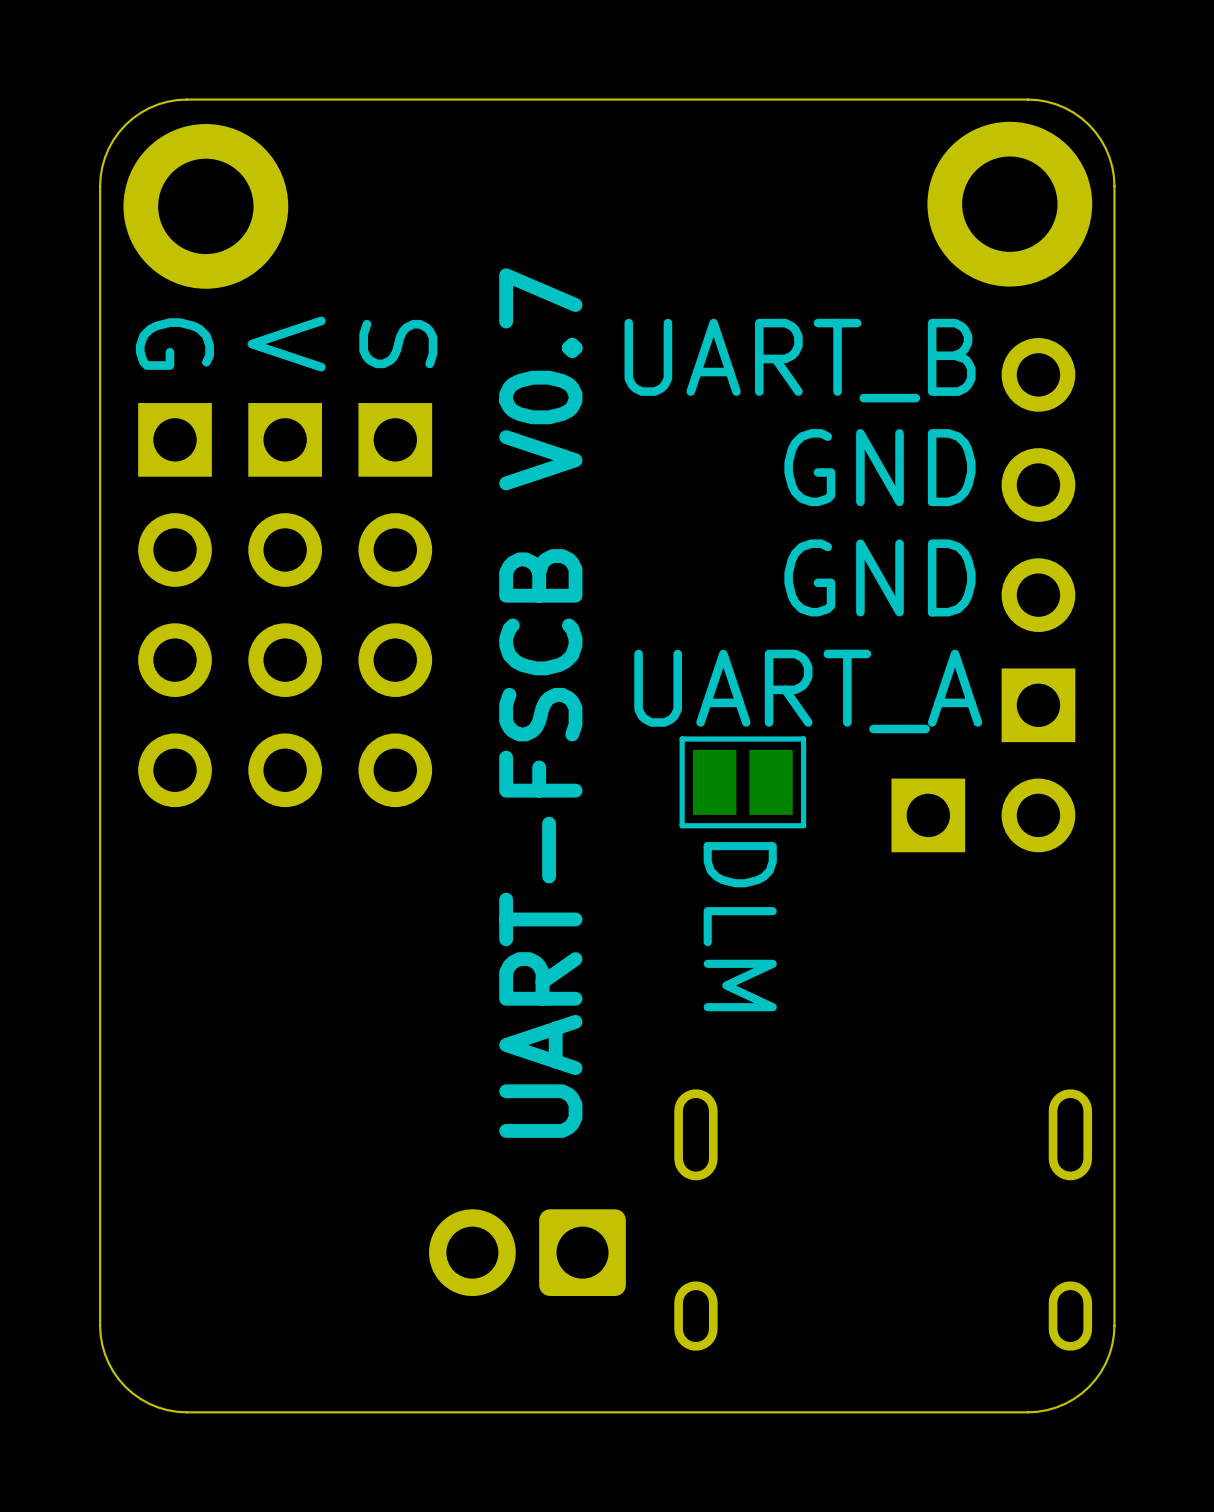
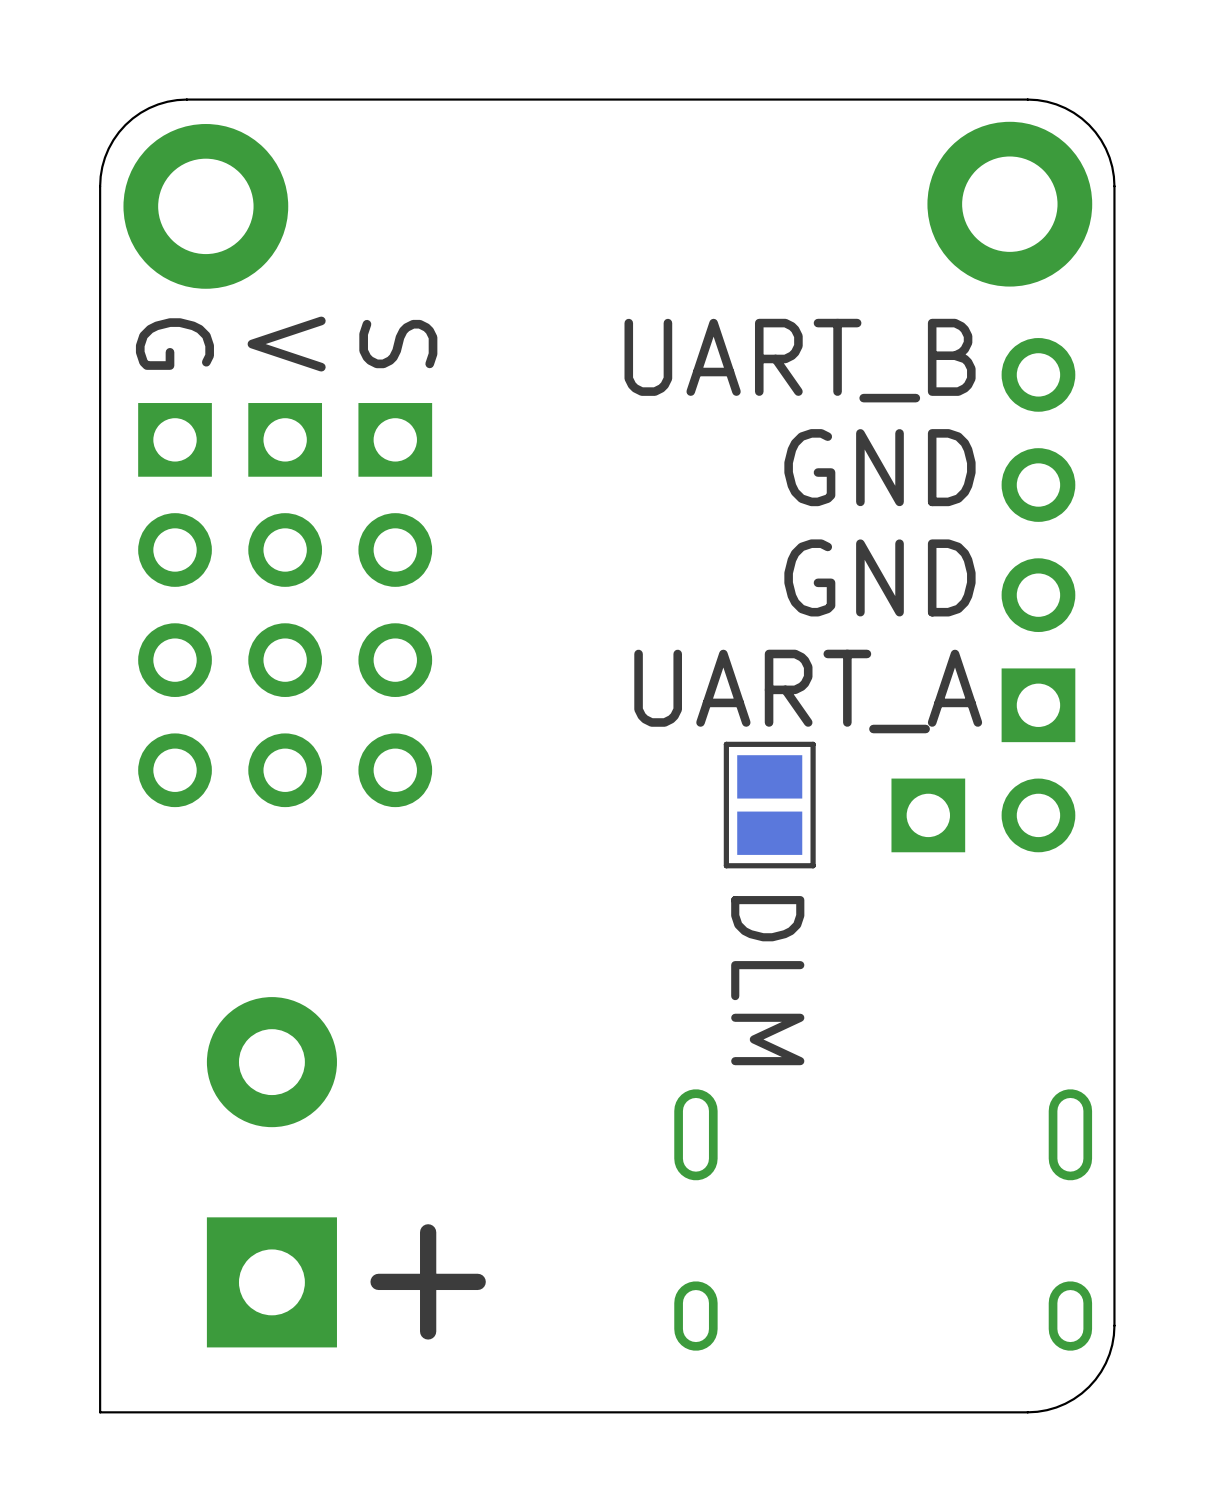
text: UART-FSCB V0.7 (540, 703) -> none
part rotation: 0° (742, 782) -> 90° clockwise (769, 805)
text position: DLM (740, 926) -> DLM (767, 980)
part: none -> (271, 1172)
part: (527, 1252) -> none
text: none -> + (428, 1281)
board edge: (100, 1325) (102, 1344) (108, 1363) (125, 1386) (149, 1403) (167, 1410) (186, 1412) -> (100, 1325) (100, 1412) (186, 1412)

